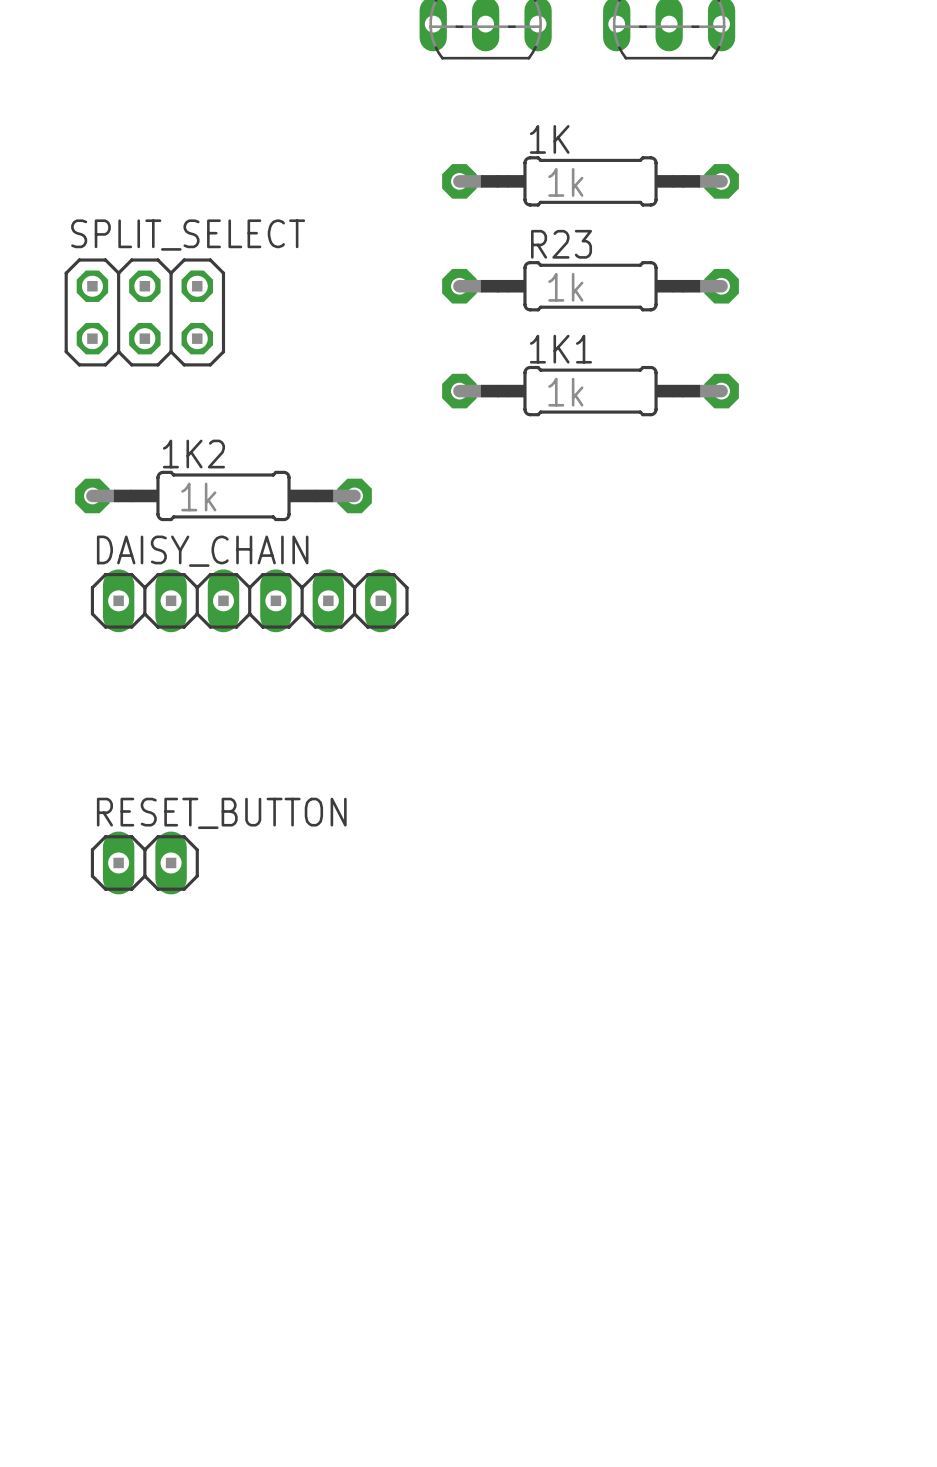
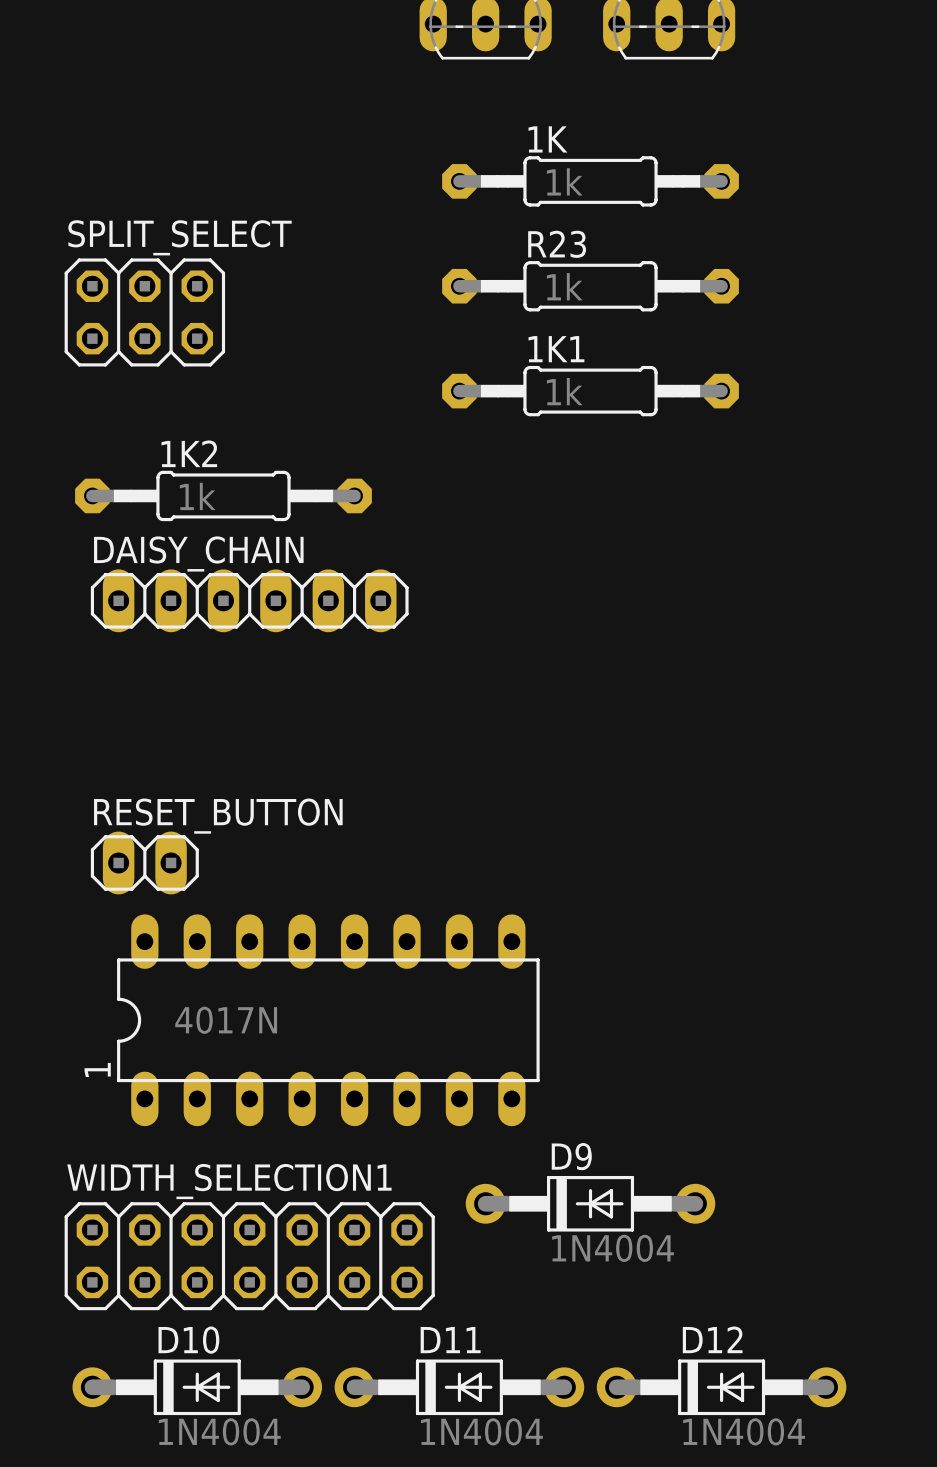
1: none -> 4017N (328, 1020)
D9: none -> 1N4004 (590, 1203)
WIDTH_SELECTION1: none -> (249, 1256)
D10: none -> 1N4004 (197, 1387)
D11: none -> 1N4004 (459, 1387)
D12: none -> 1N4004 (721, 1387)

